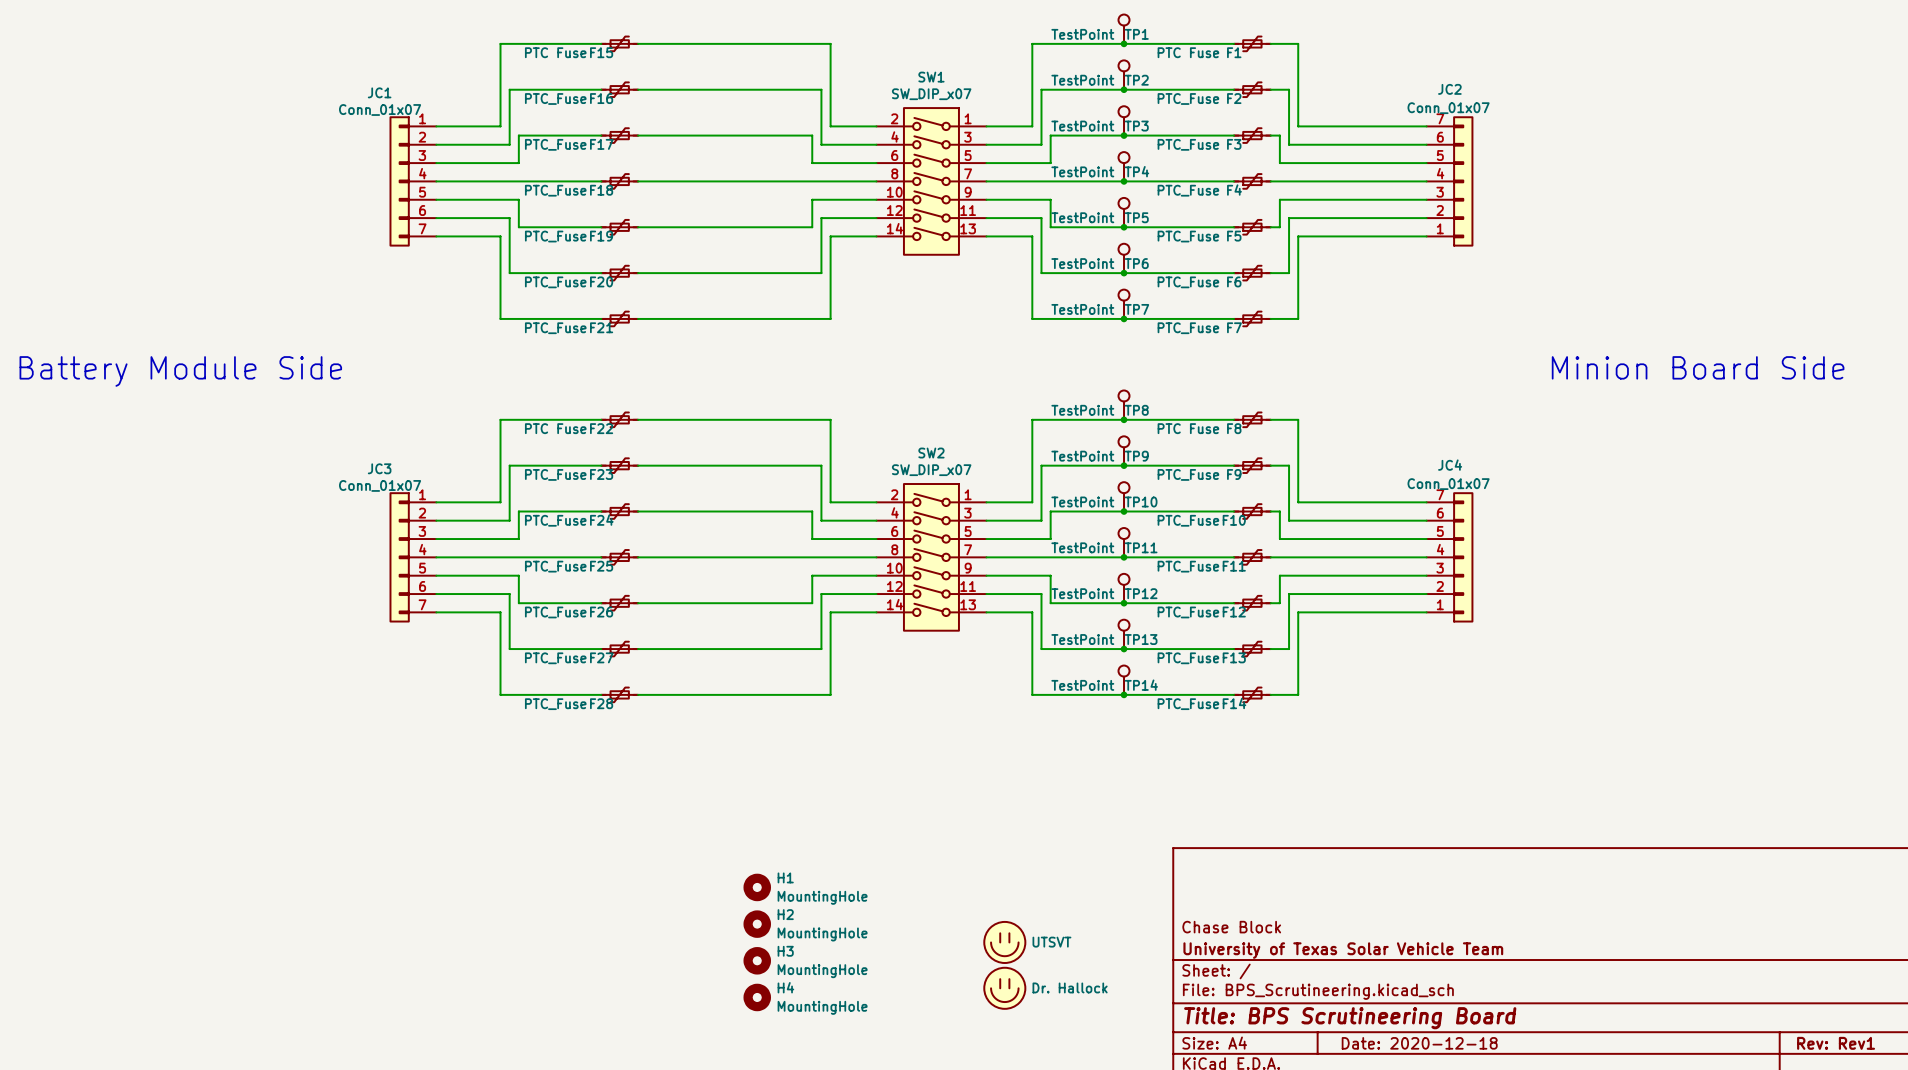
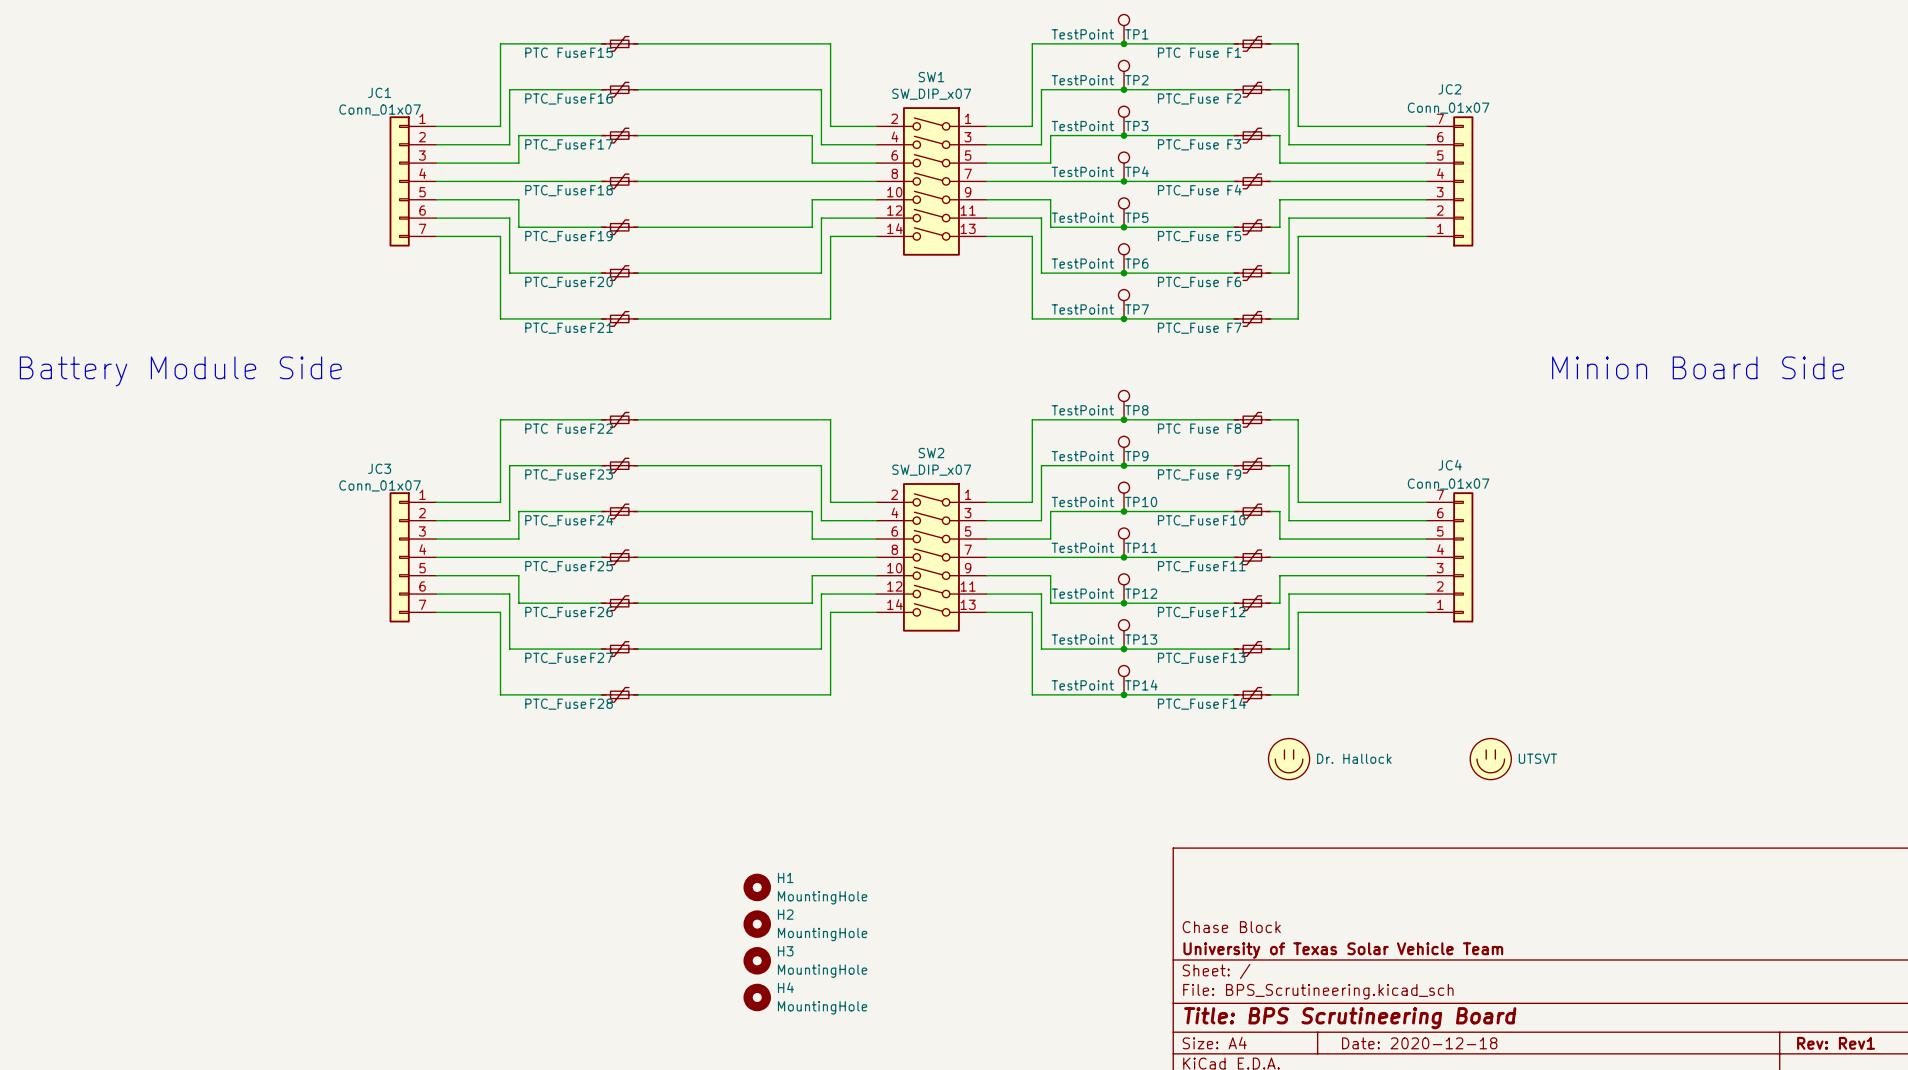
part: none -> Dr. Hallock (1289, 759)
part: none -> UTSVT (1490, 759)
part: UTSVT (1004, 942) -> none
part: Dr. Hallock (1004, 988) -> none

